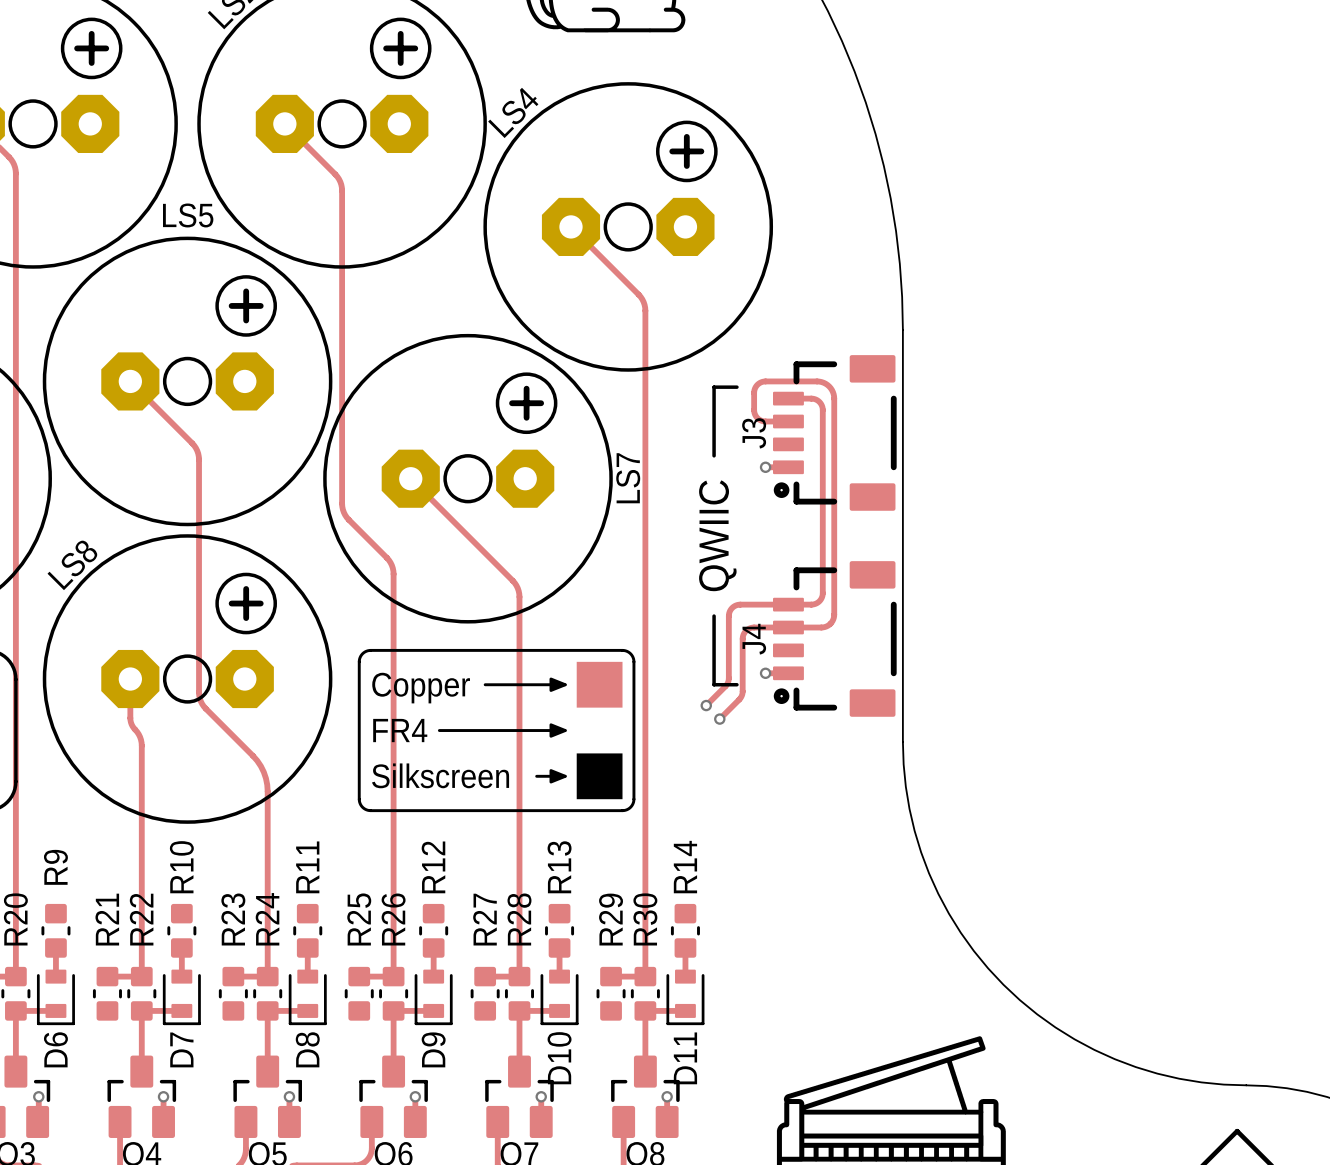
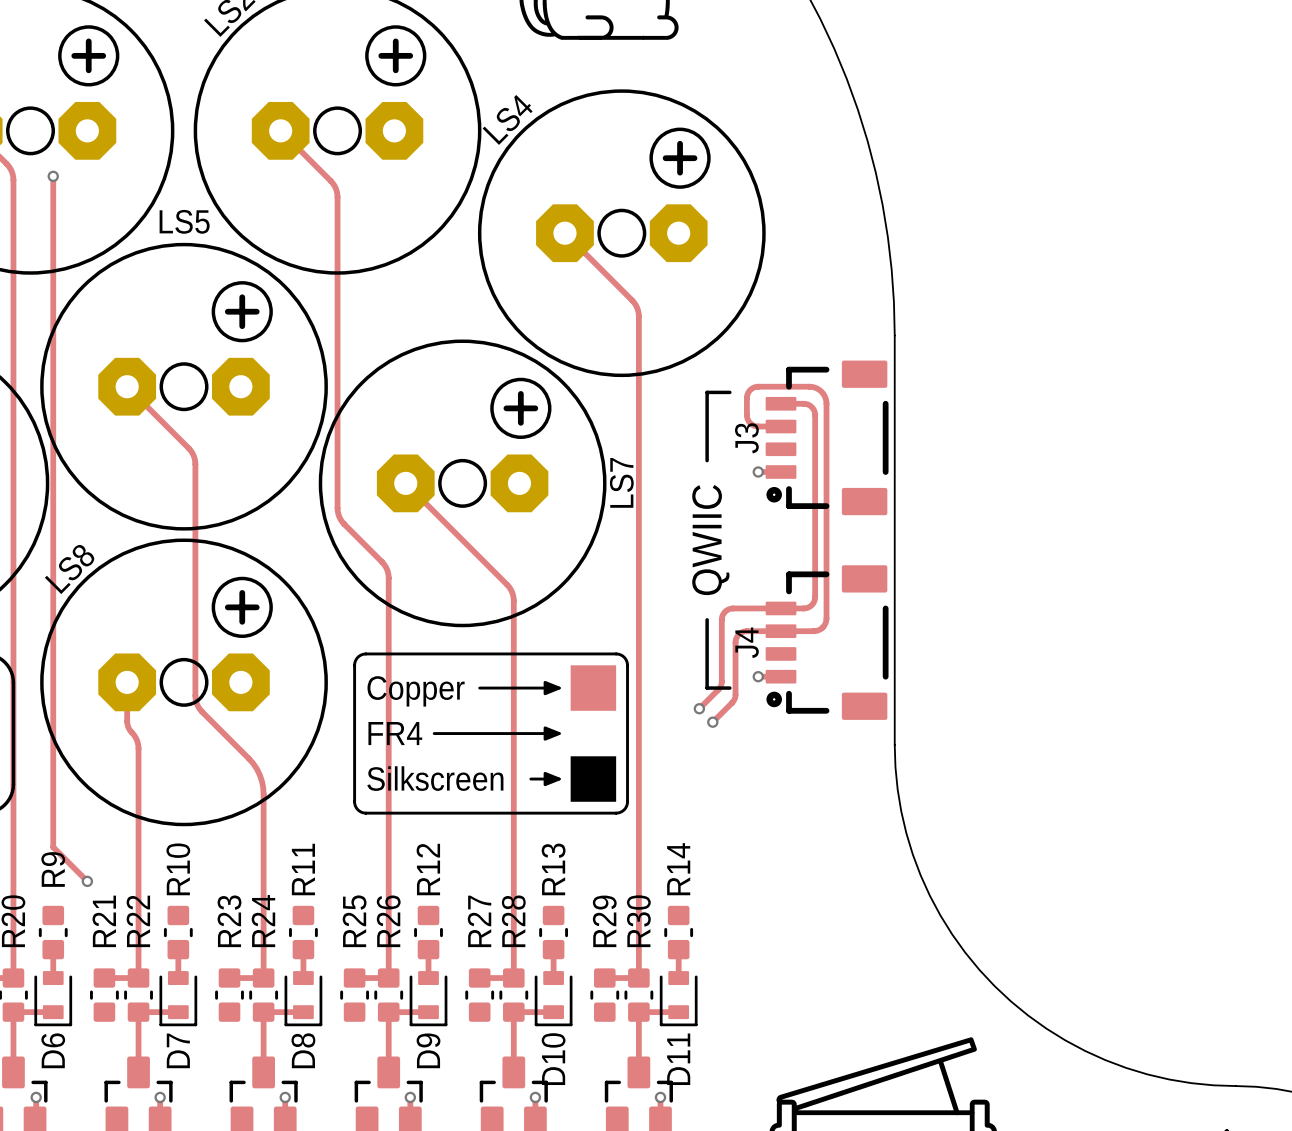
track: none -> (53, 176) (53, 847) (87, 881)
via: none -> (53, 176)
via: none -> (87, 881)

